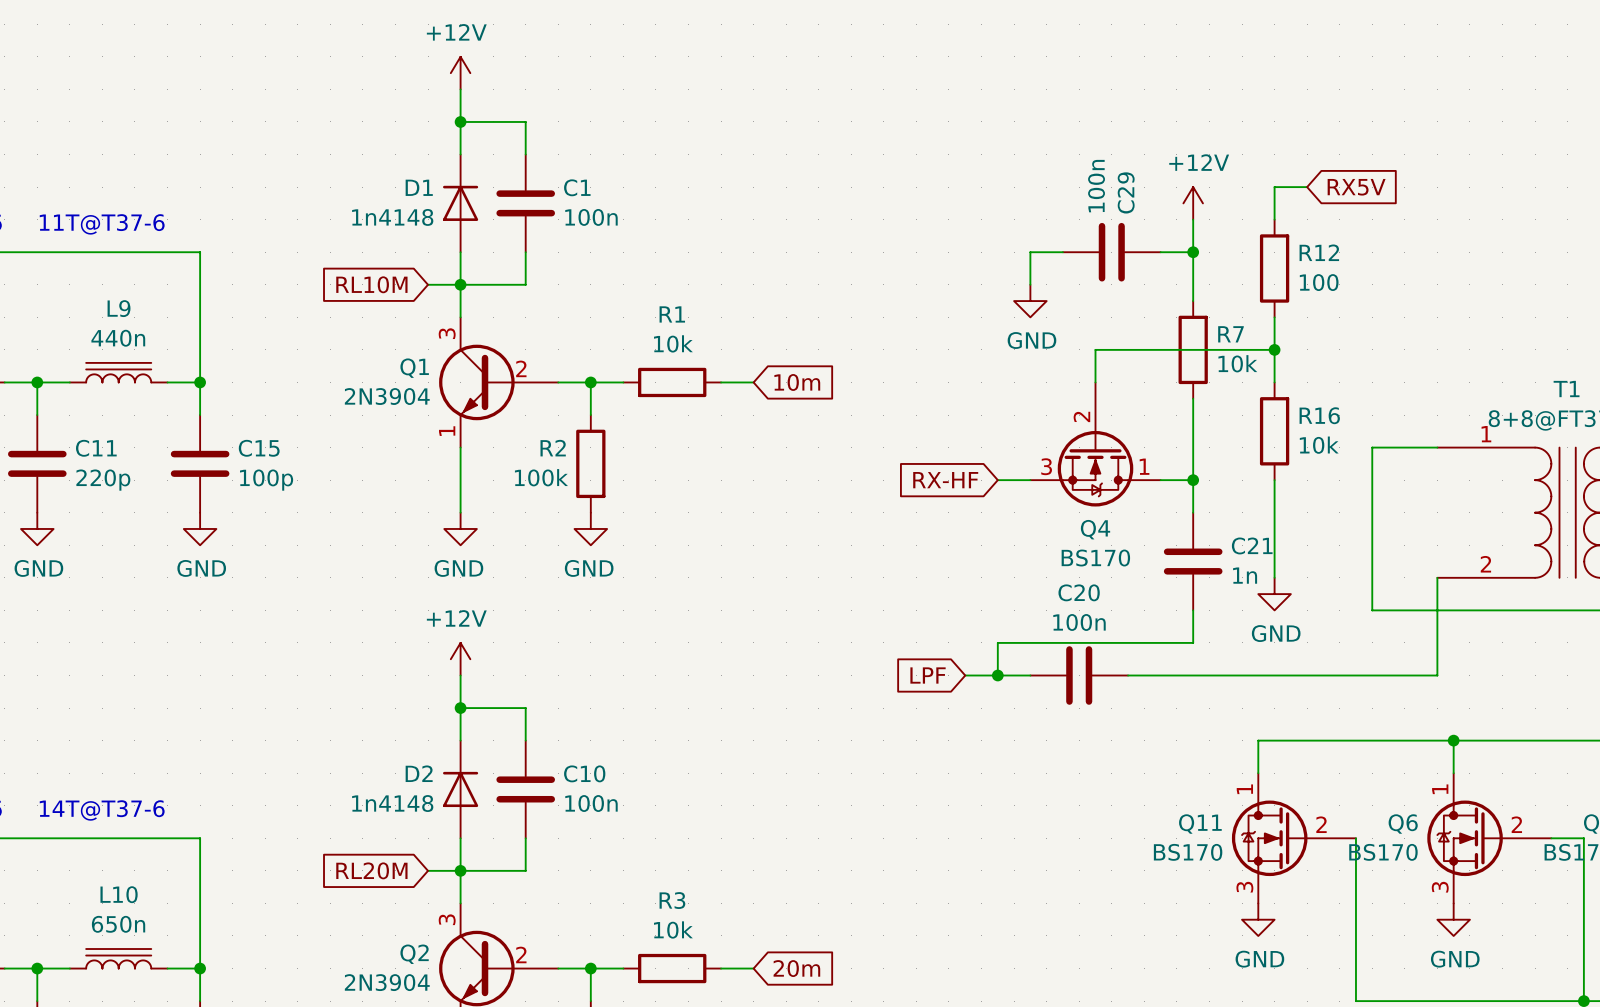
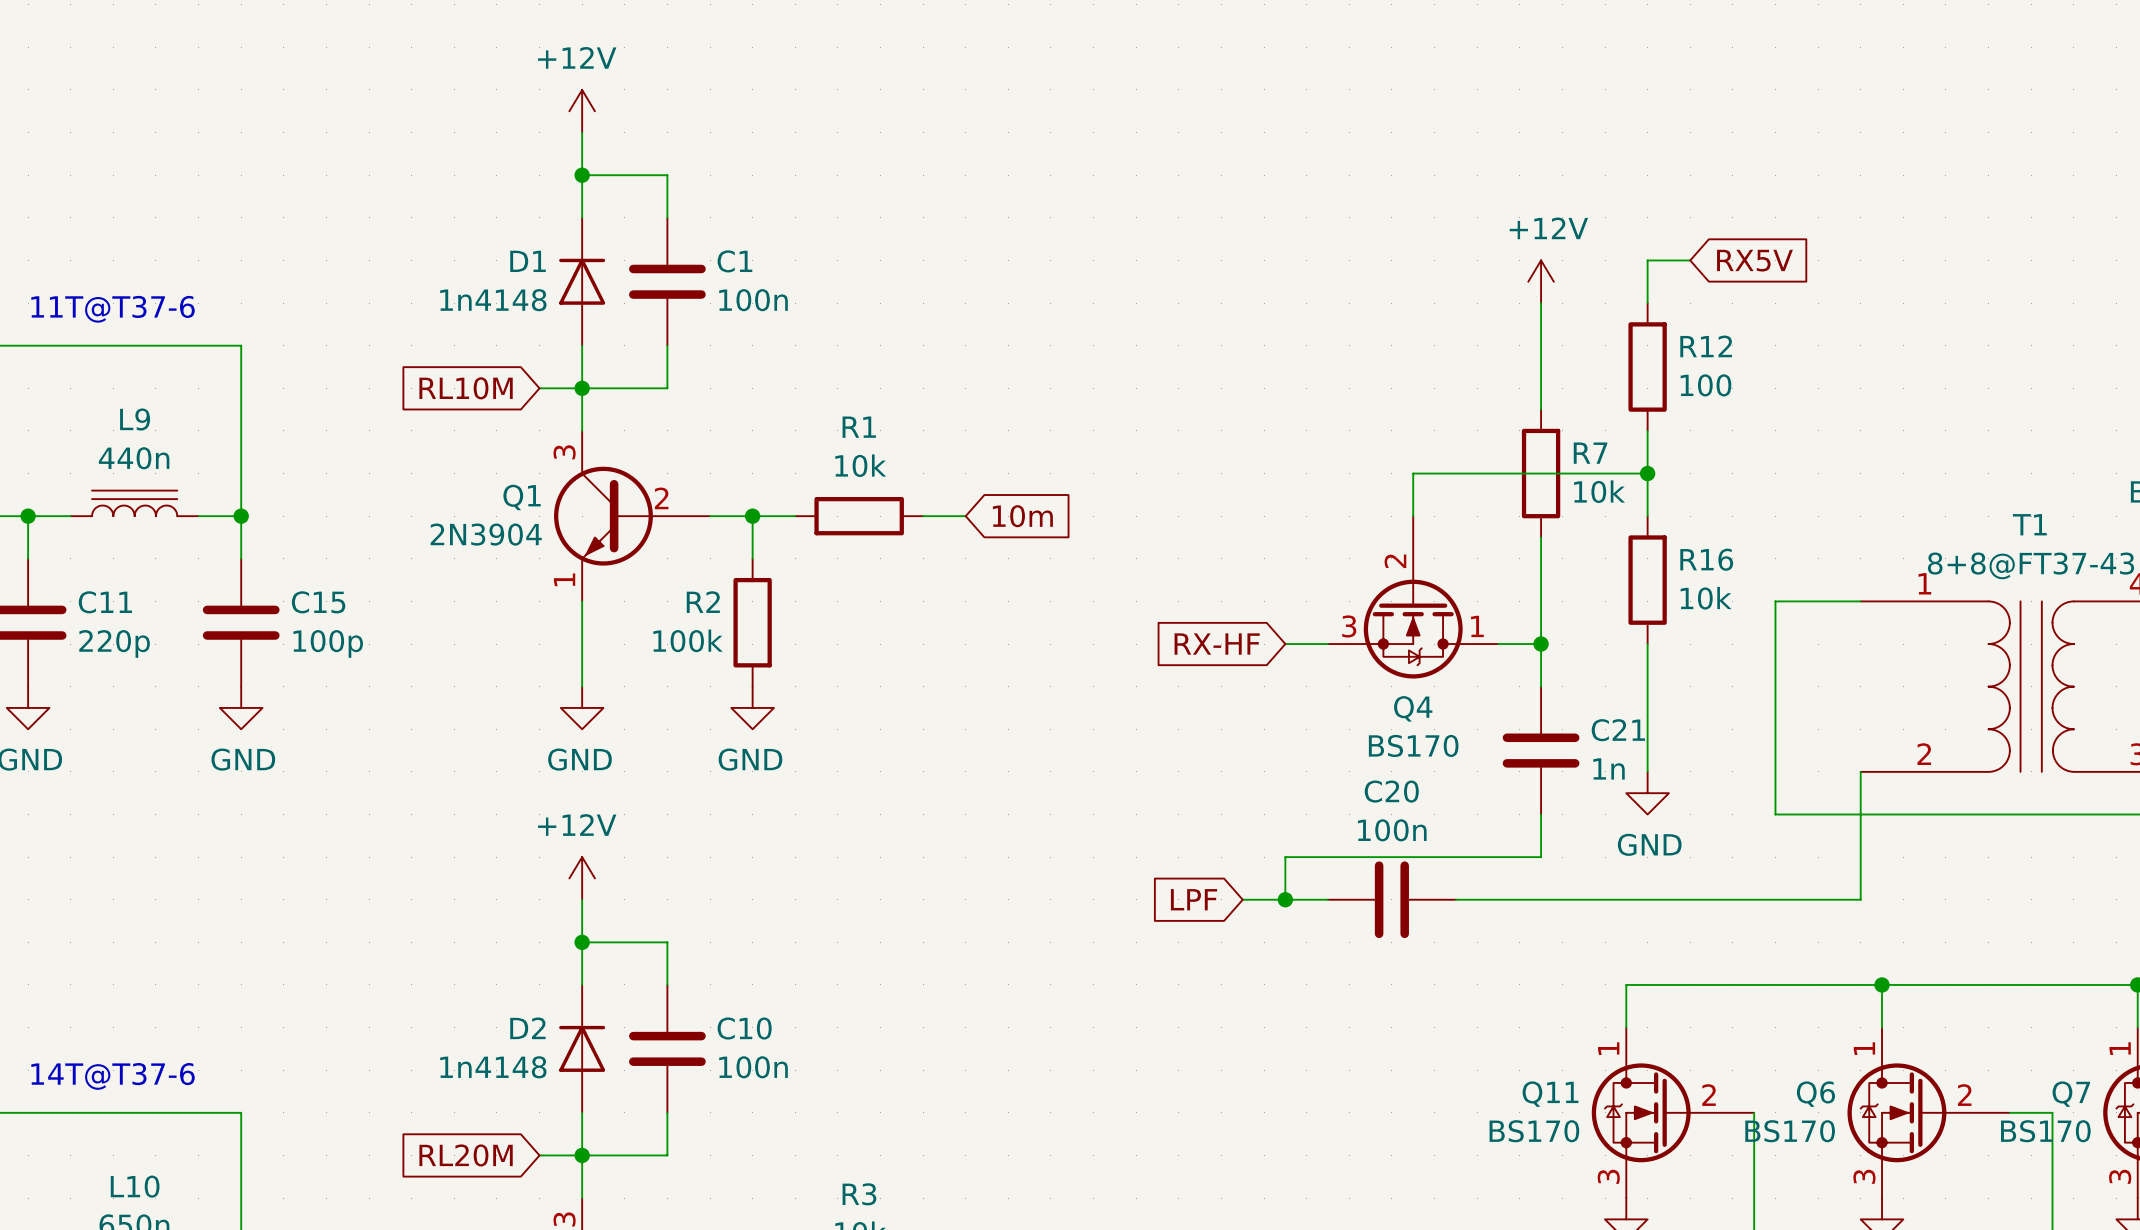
wire: (1062, 252) (1030, 252) (1030, 284) -> none
C29: 100n (1111, 252) -> none
wire: (1160, 252) (1193, 252) -> none
junction: (1193, 252) -> none
power symbol: GND (1030, 301) -> none

